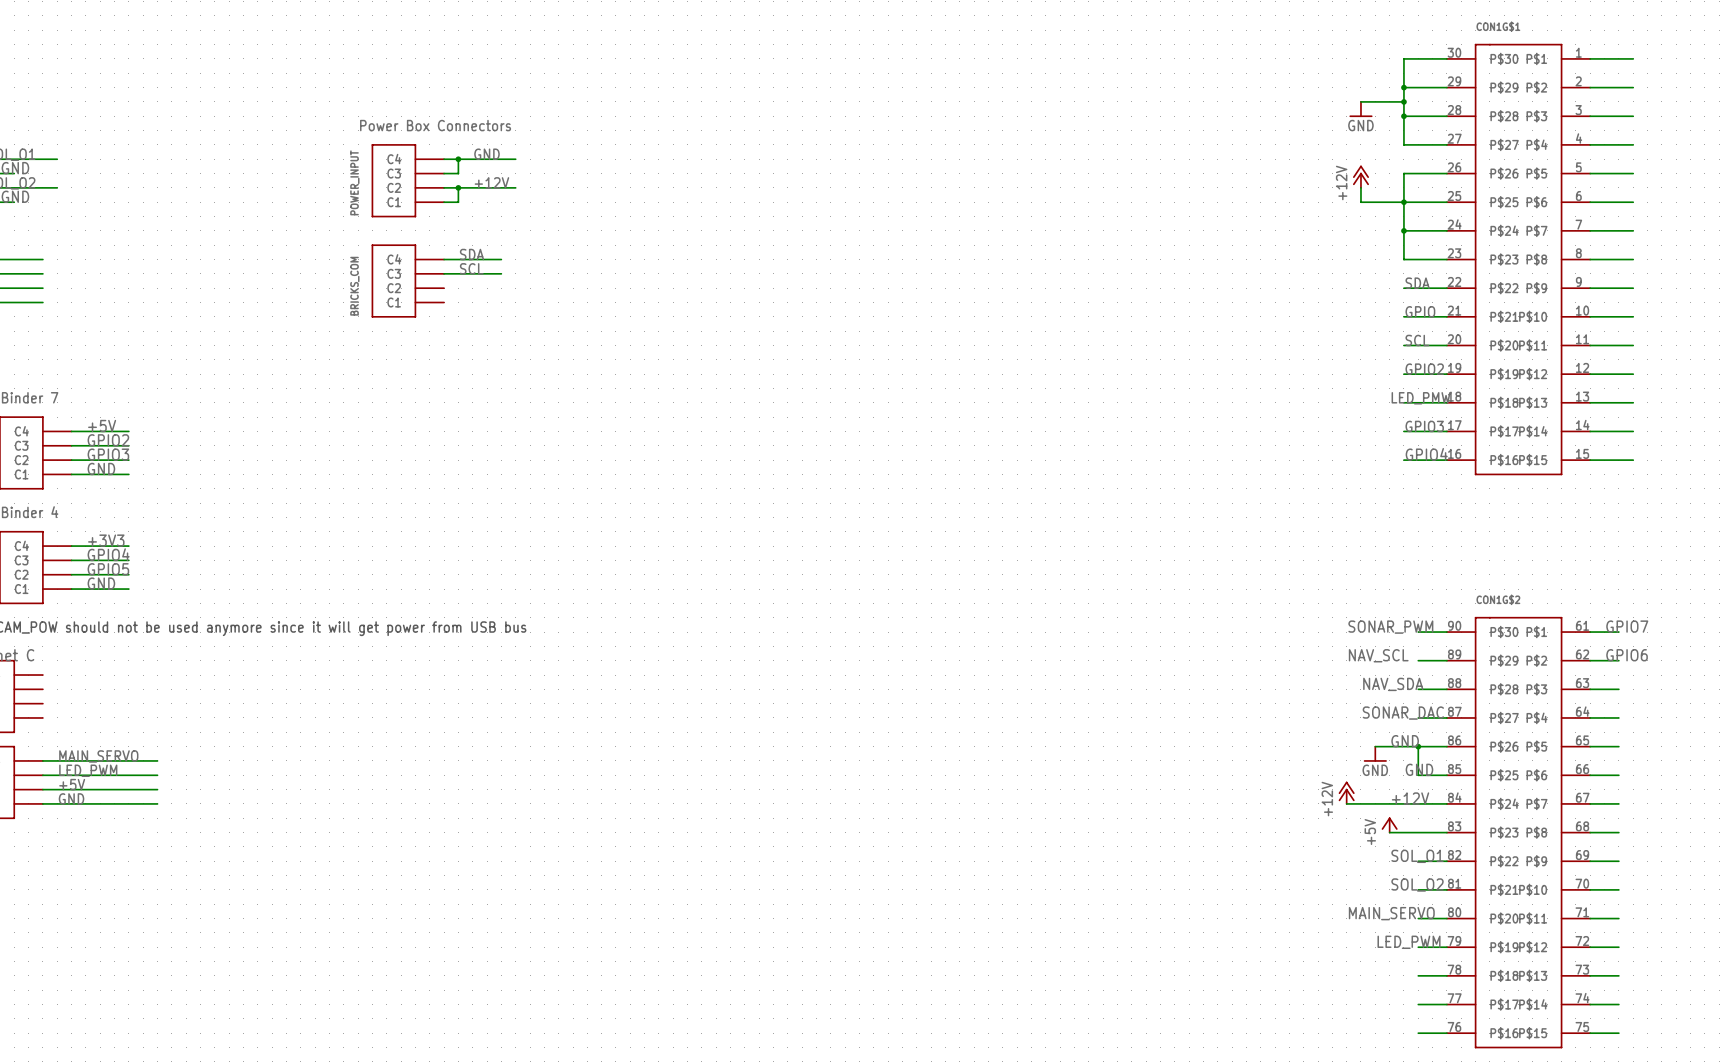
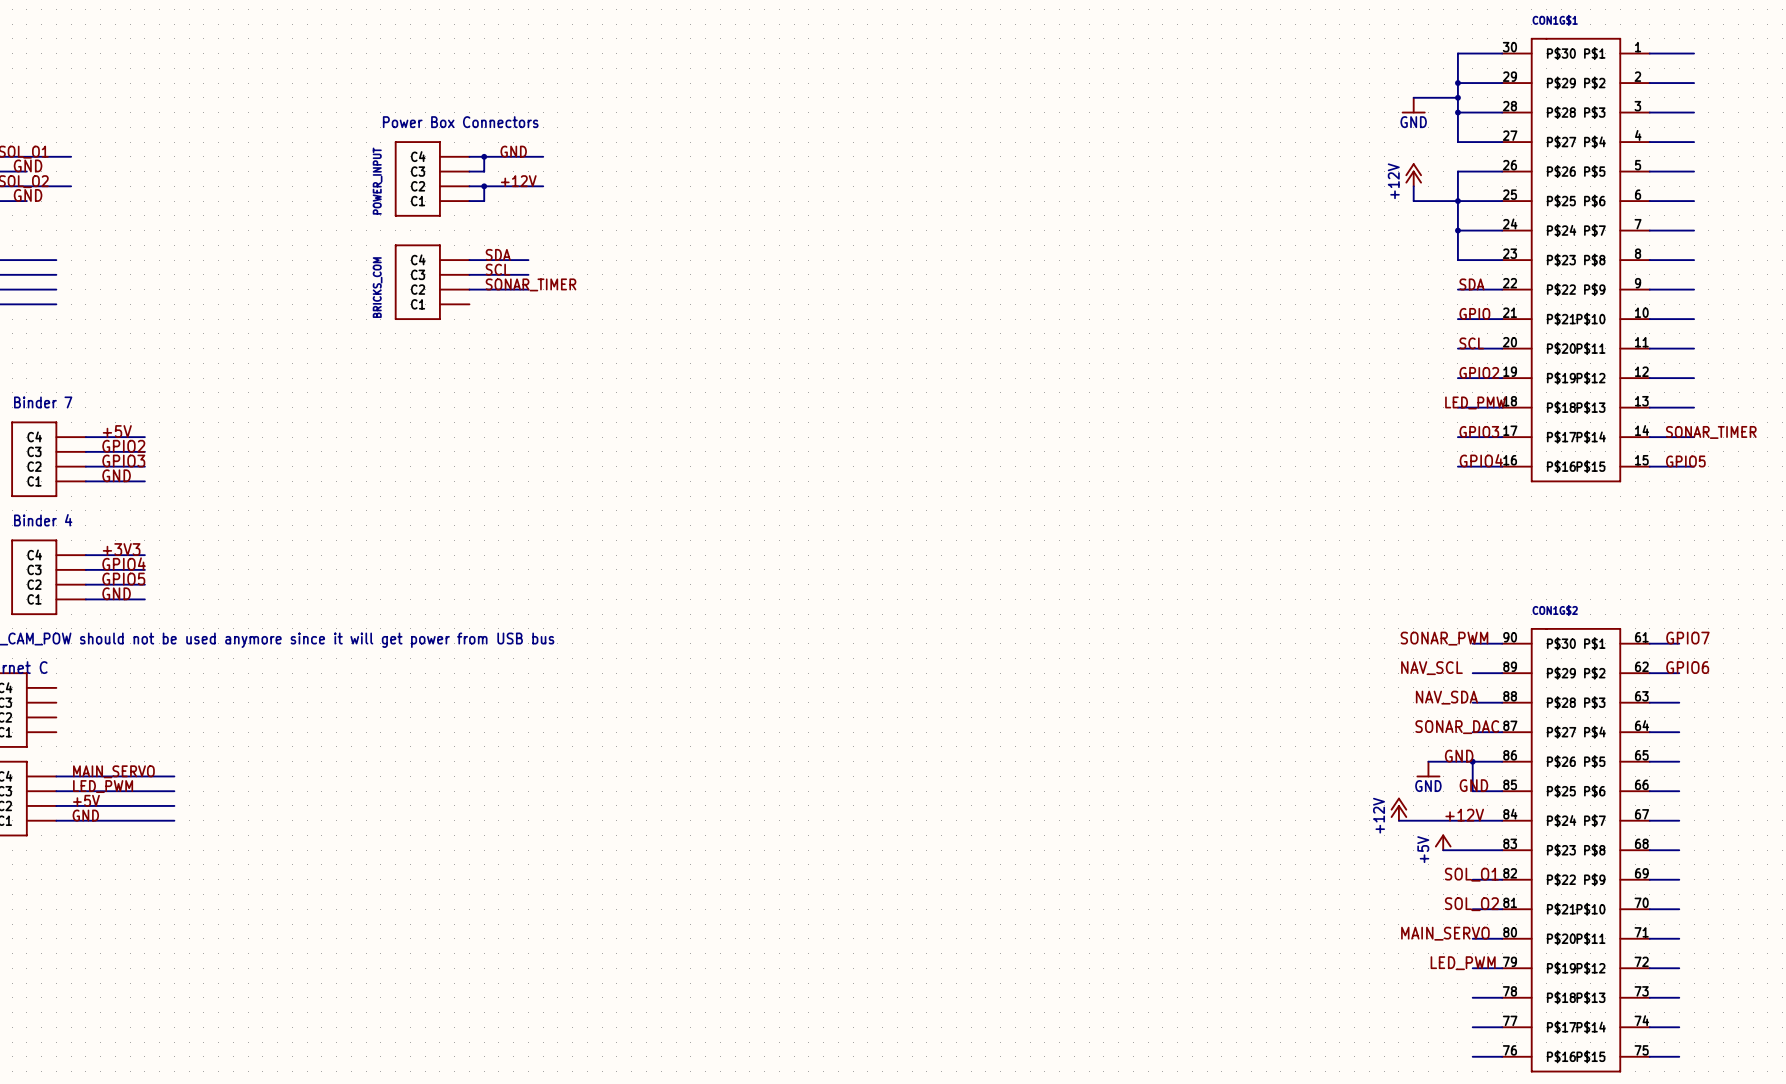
label: none -> SONAR_TIMER (531, 284)
wire: none -> (469, 289) (528, 289)
label: none -> SONAR_TIMER (1711, 432)
label: none -> GPIO5 (1685, 461)

